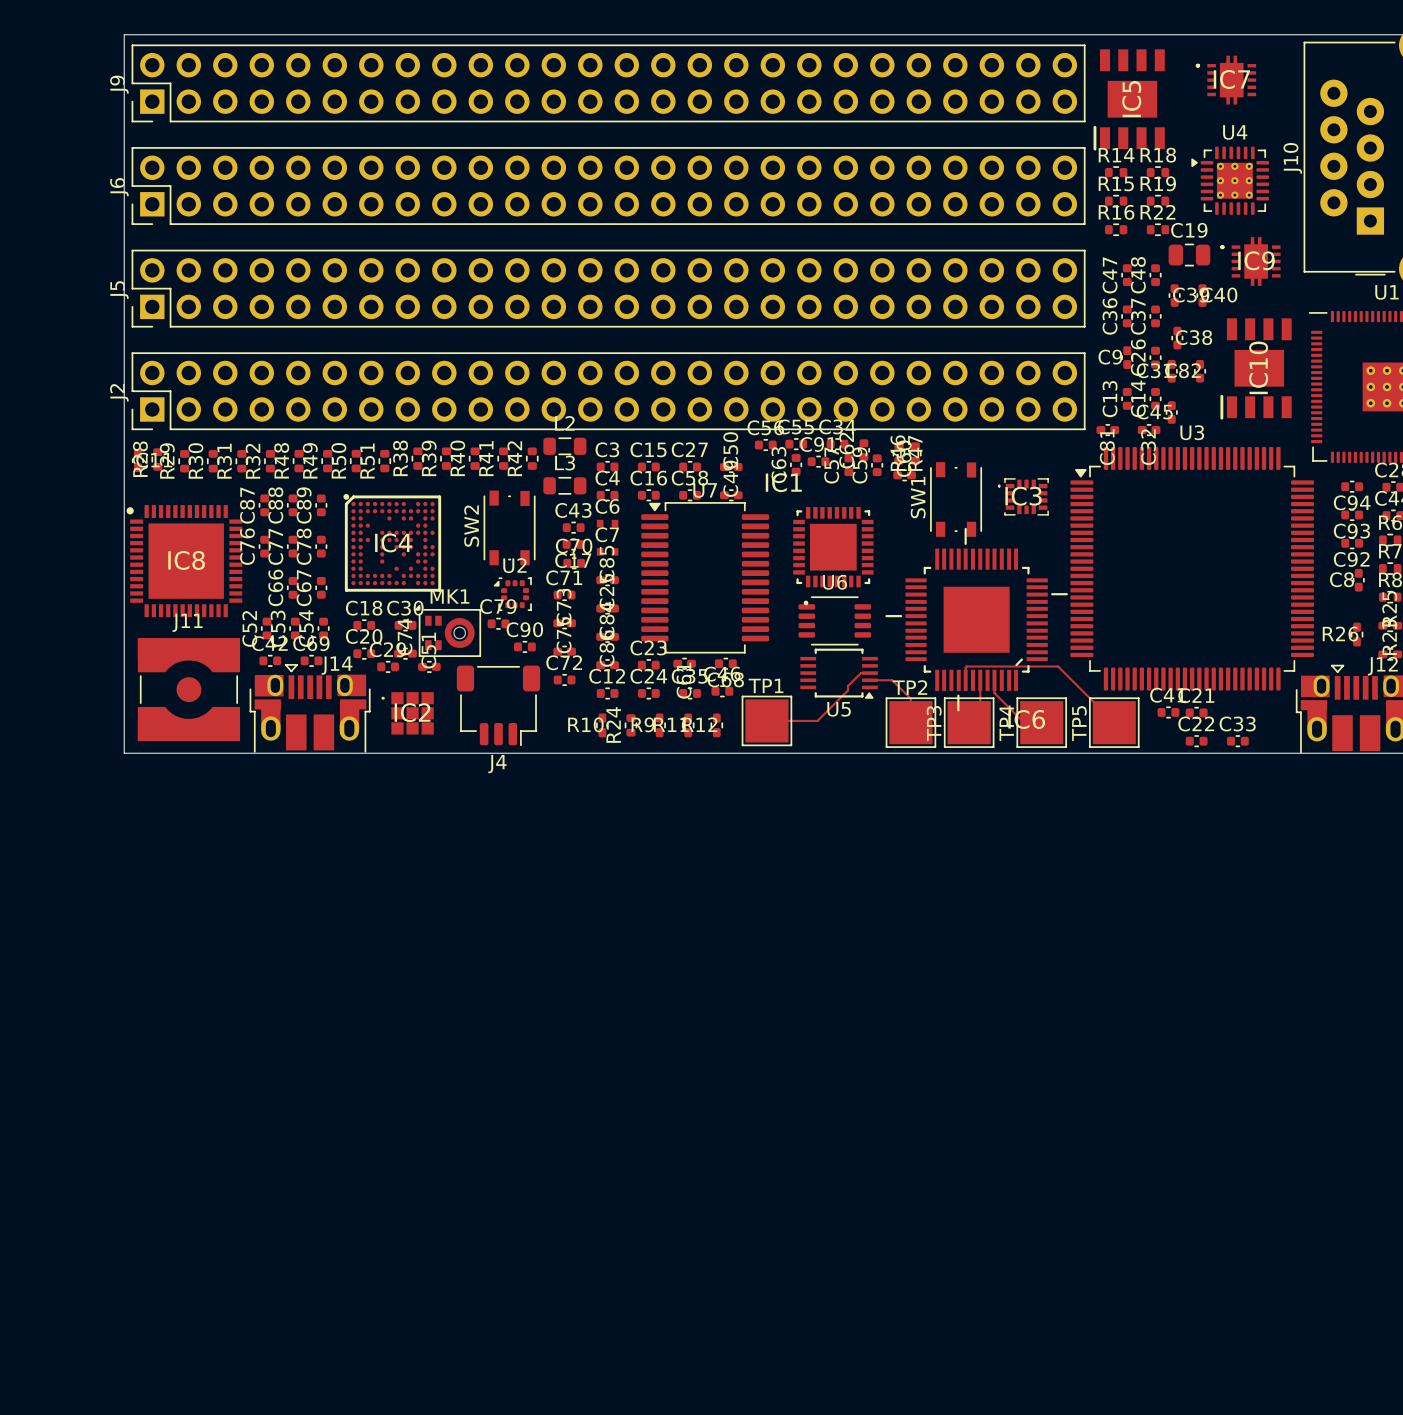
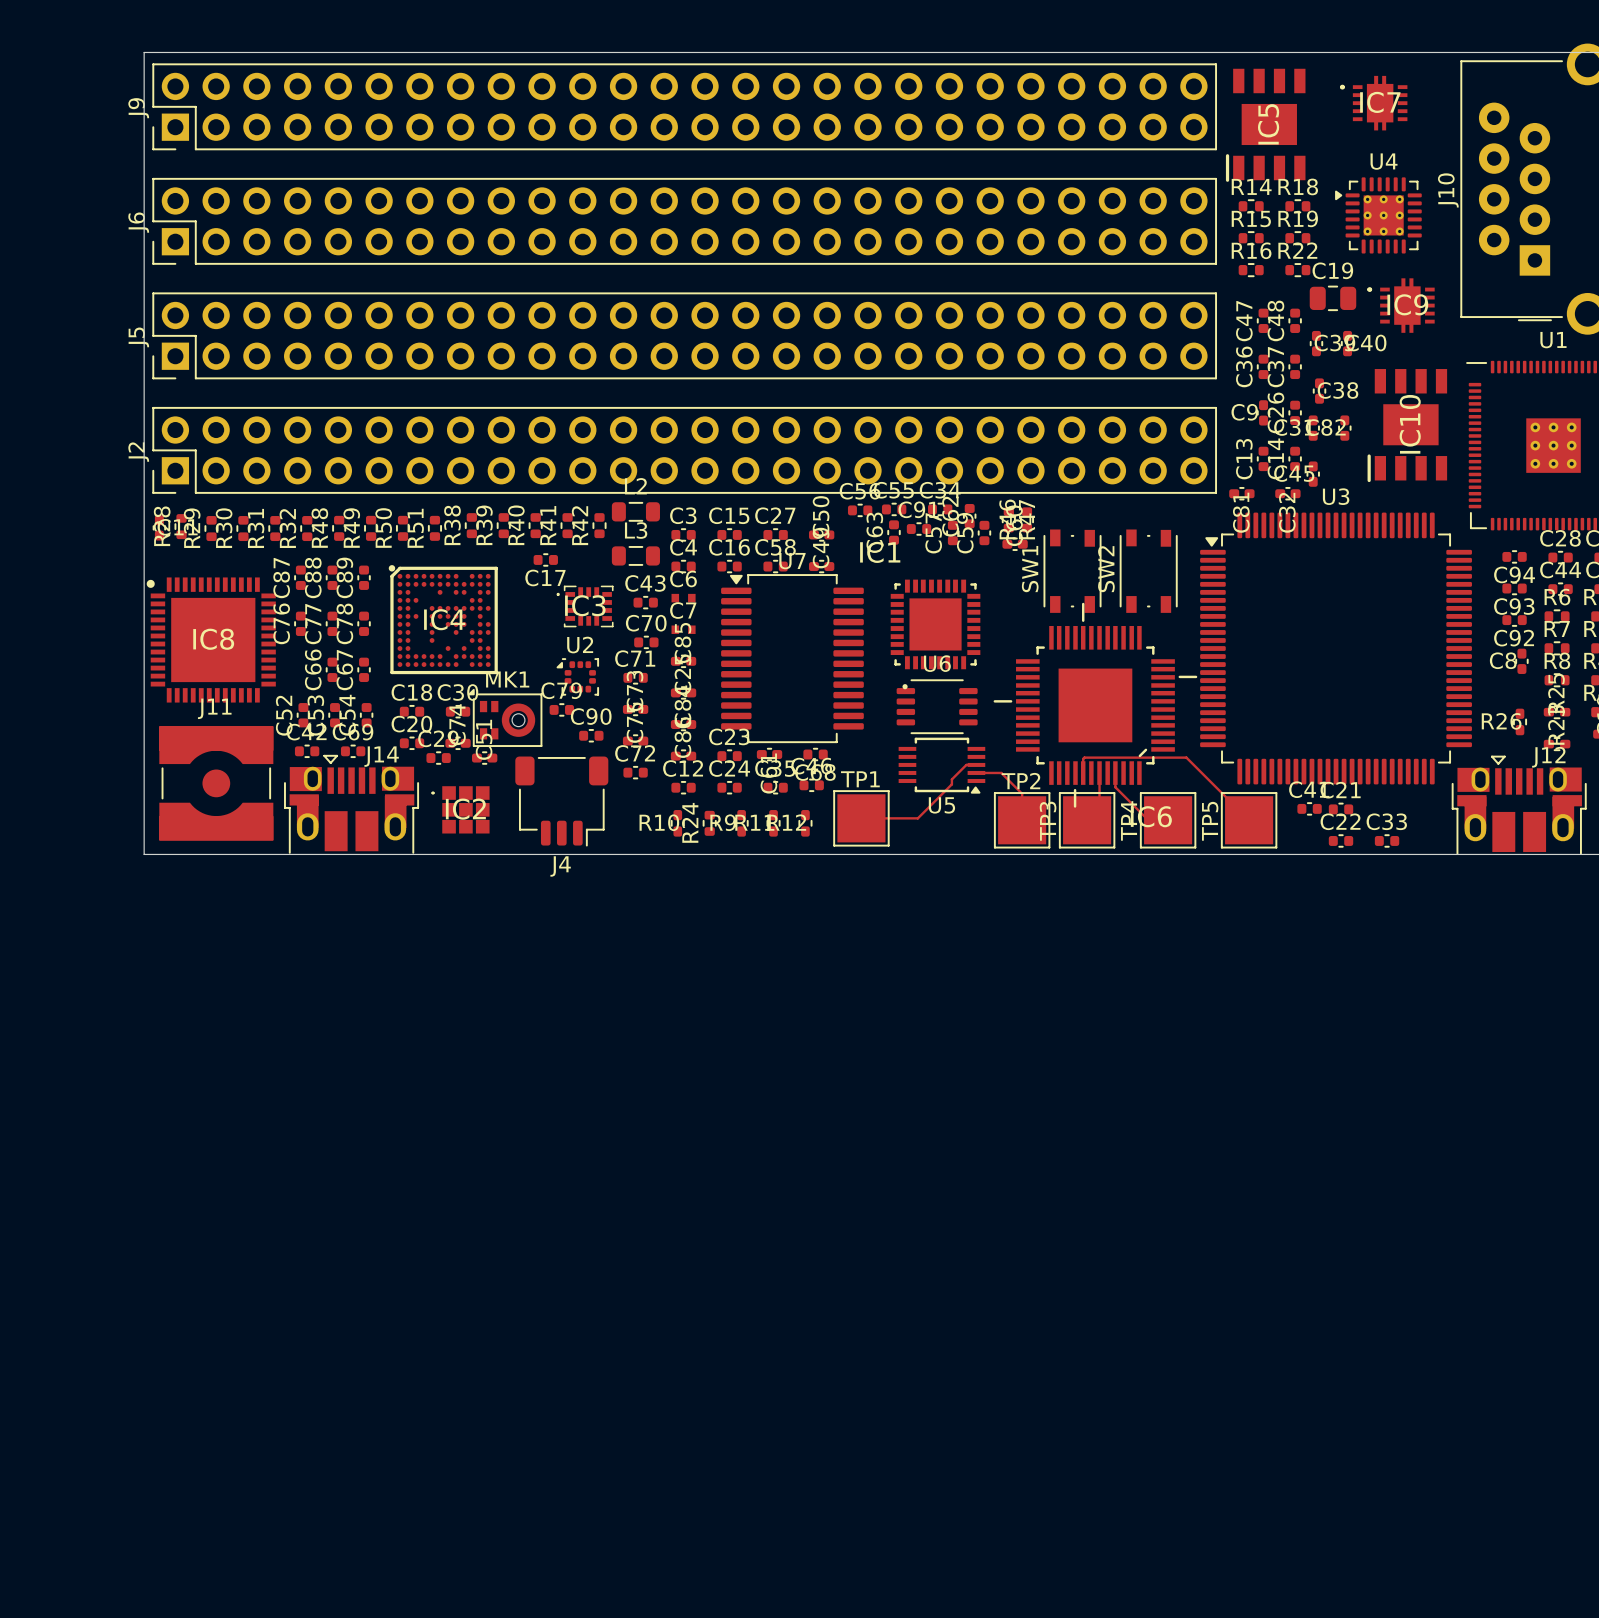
IC3 position: (1023, 496) -> (585, 606)
SW2 position: (509, 527) -> (1148, 571)
C17 position: (573, 544) -> (545, 559)

